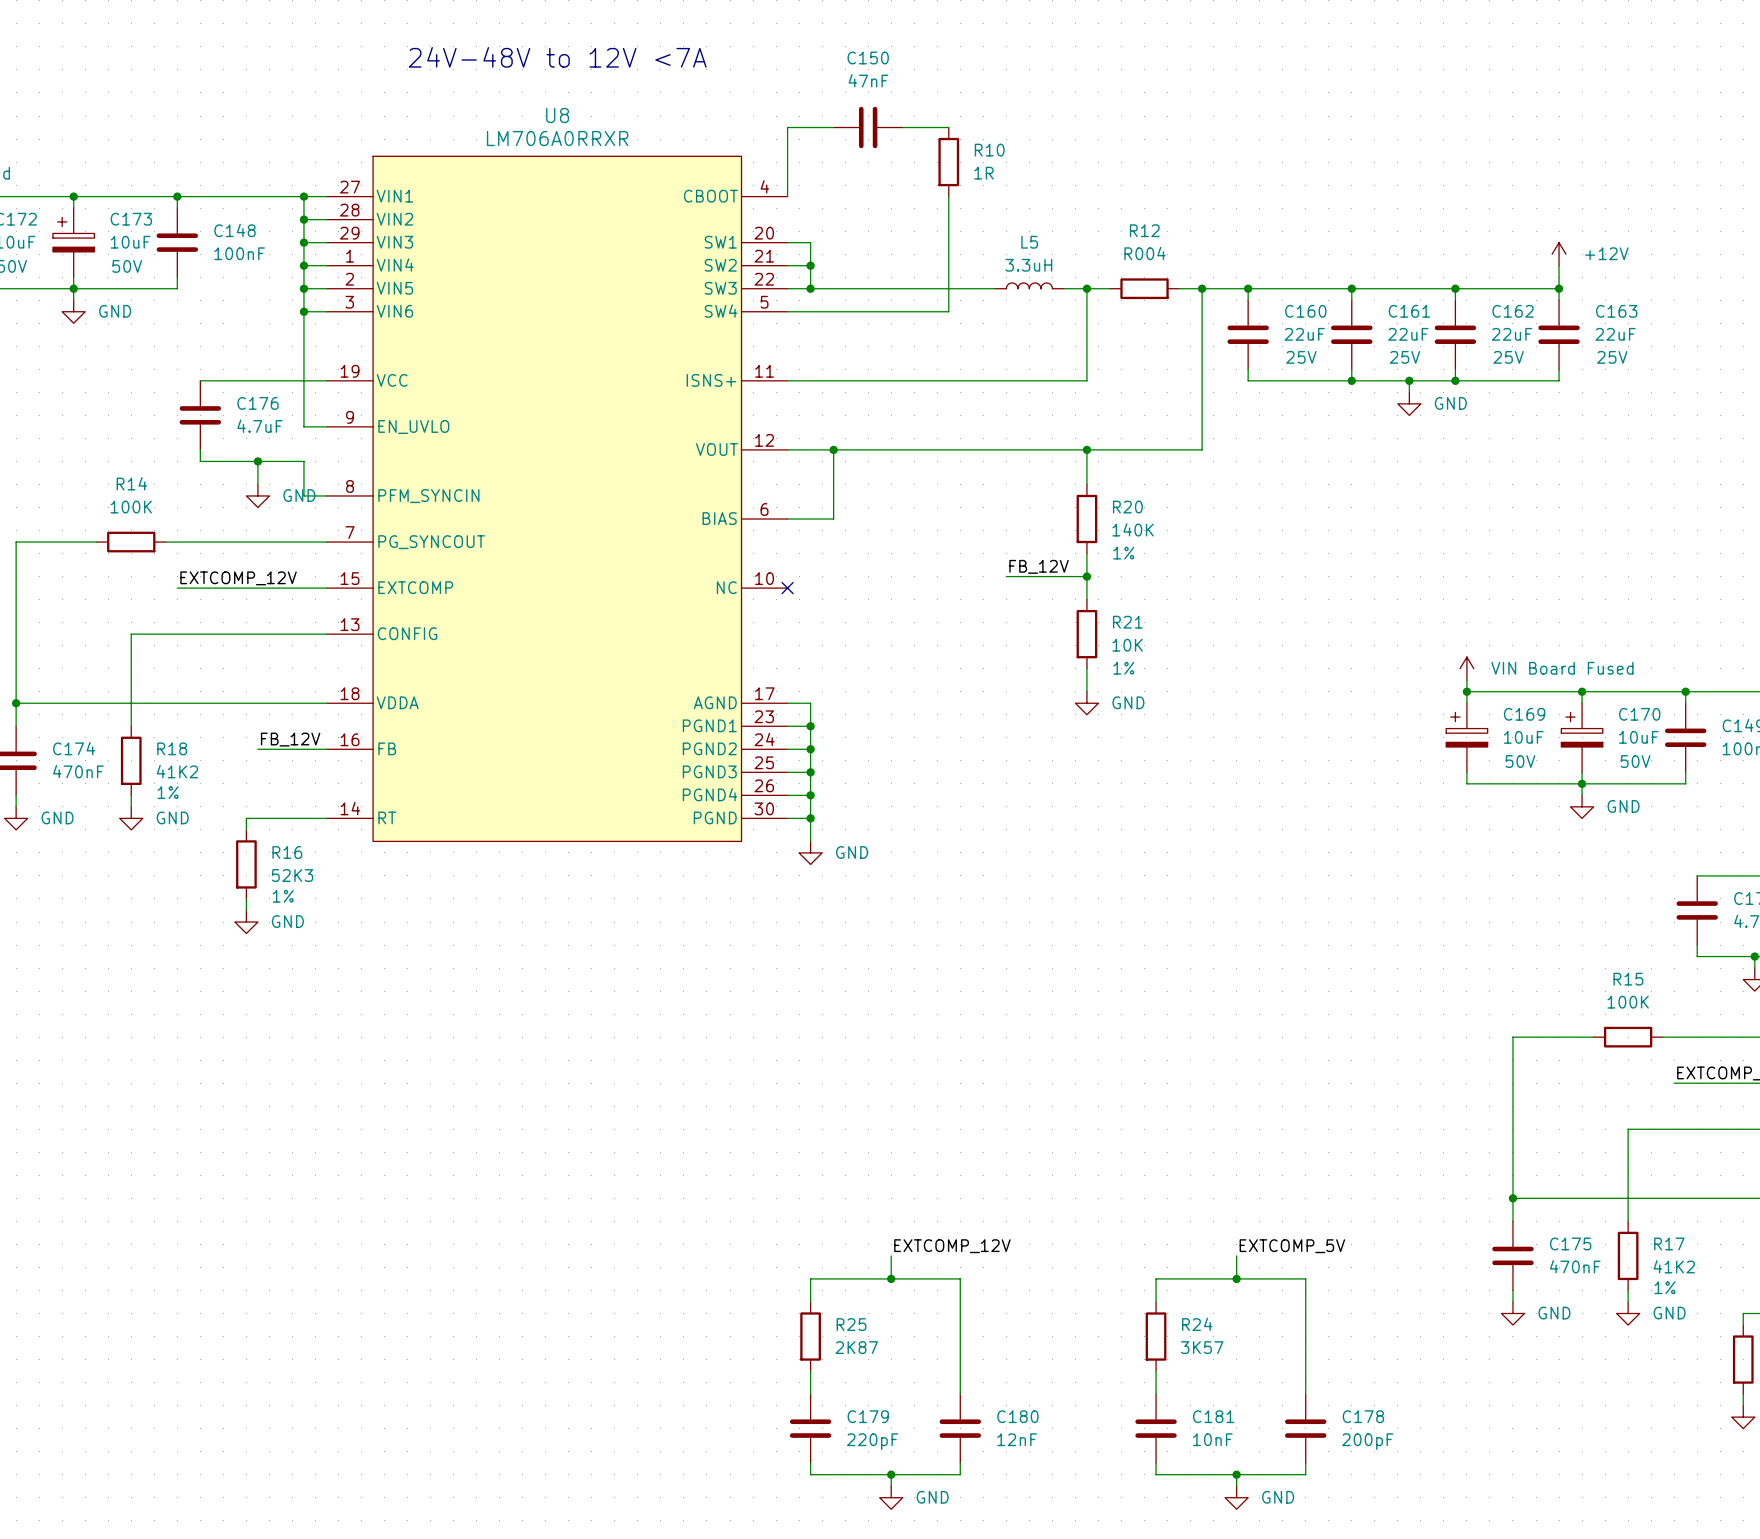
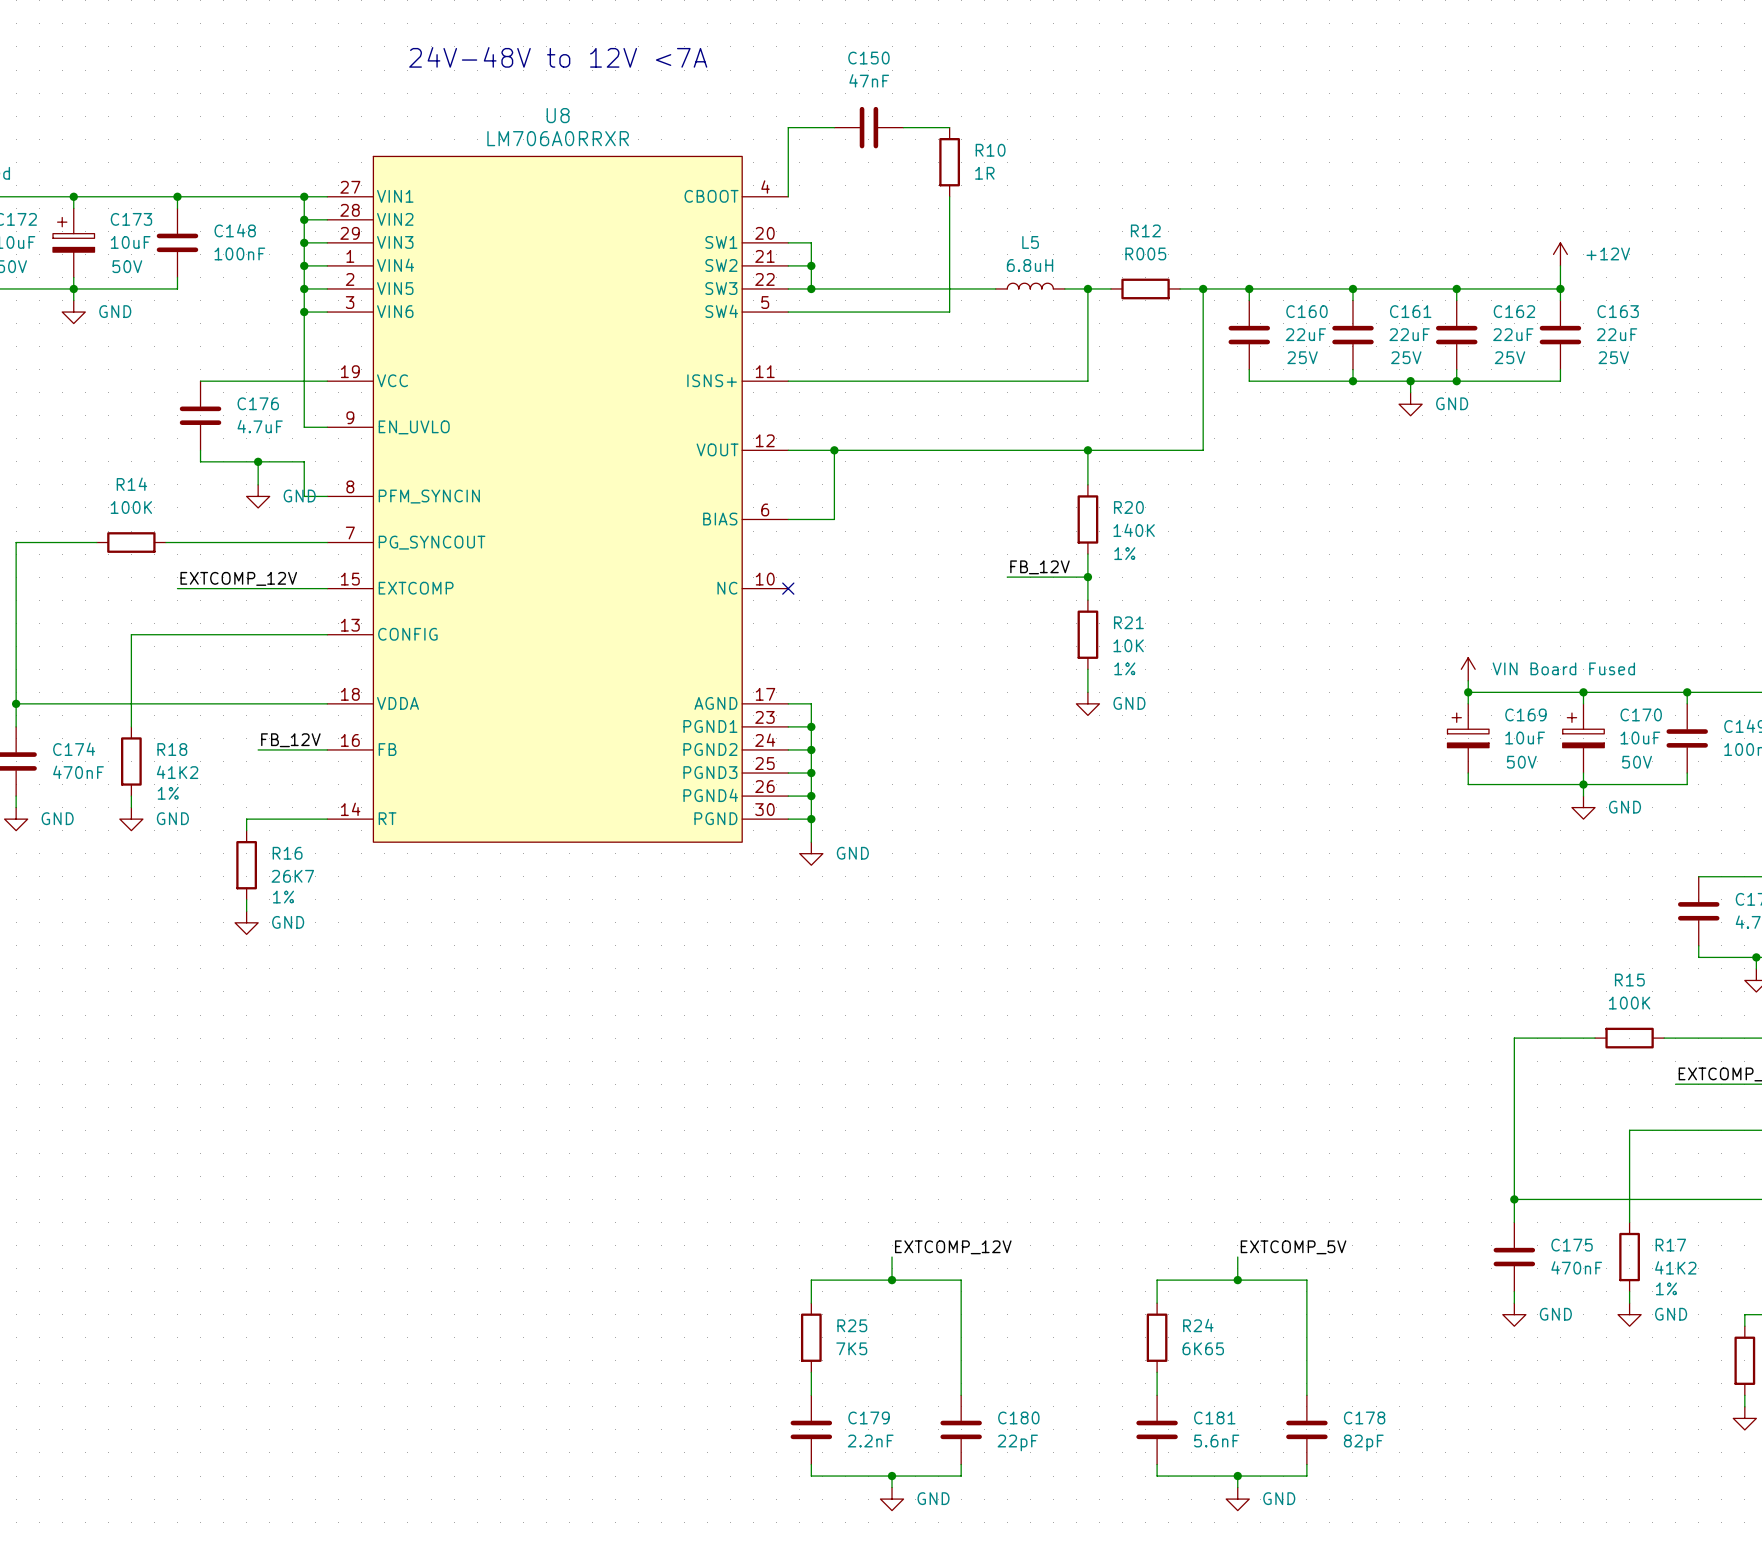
R12 value: R004 (1145, 253) -> R005 (1145, 253)
L5 value: 3.3uH (1028, 265) -> 6.8uH (1030, 265)
R16 value: 52K3 (292, 875) -> 26K7 (292, 876)
R25 value: 2K87 (856, 1347) -> 7K5 (851, 1348)
R24 value: 3K57 (1202, 1347) -> 6K65 (1203, 1348)
C180 value: 12nF (1017, 1439) -> 22pF (1017, 1442)
C181 value: 10nF (1212, 1439) -> 5.6nF (1216, 1441)
C179 value: 220pF (872, 1441) -> 2.2nF (870, 1441)
C178 value: 200pF (1367, 1441) -> 82pF (1363, 1442)

